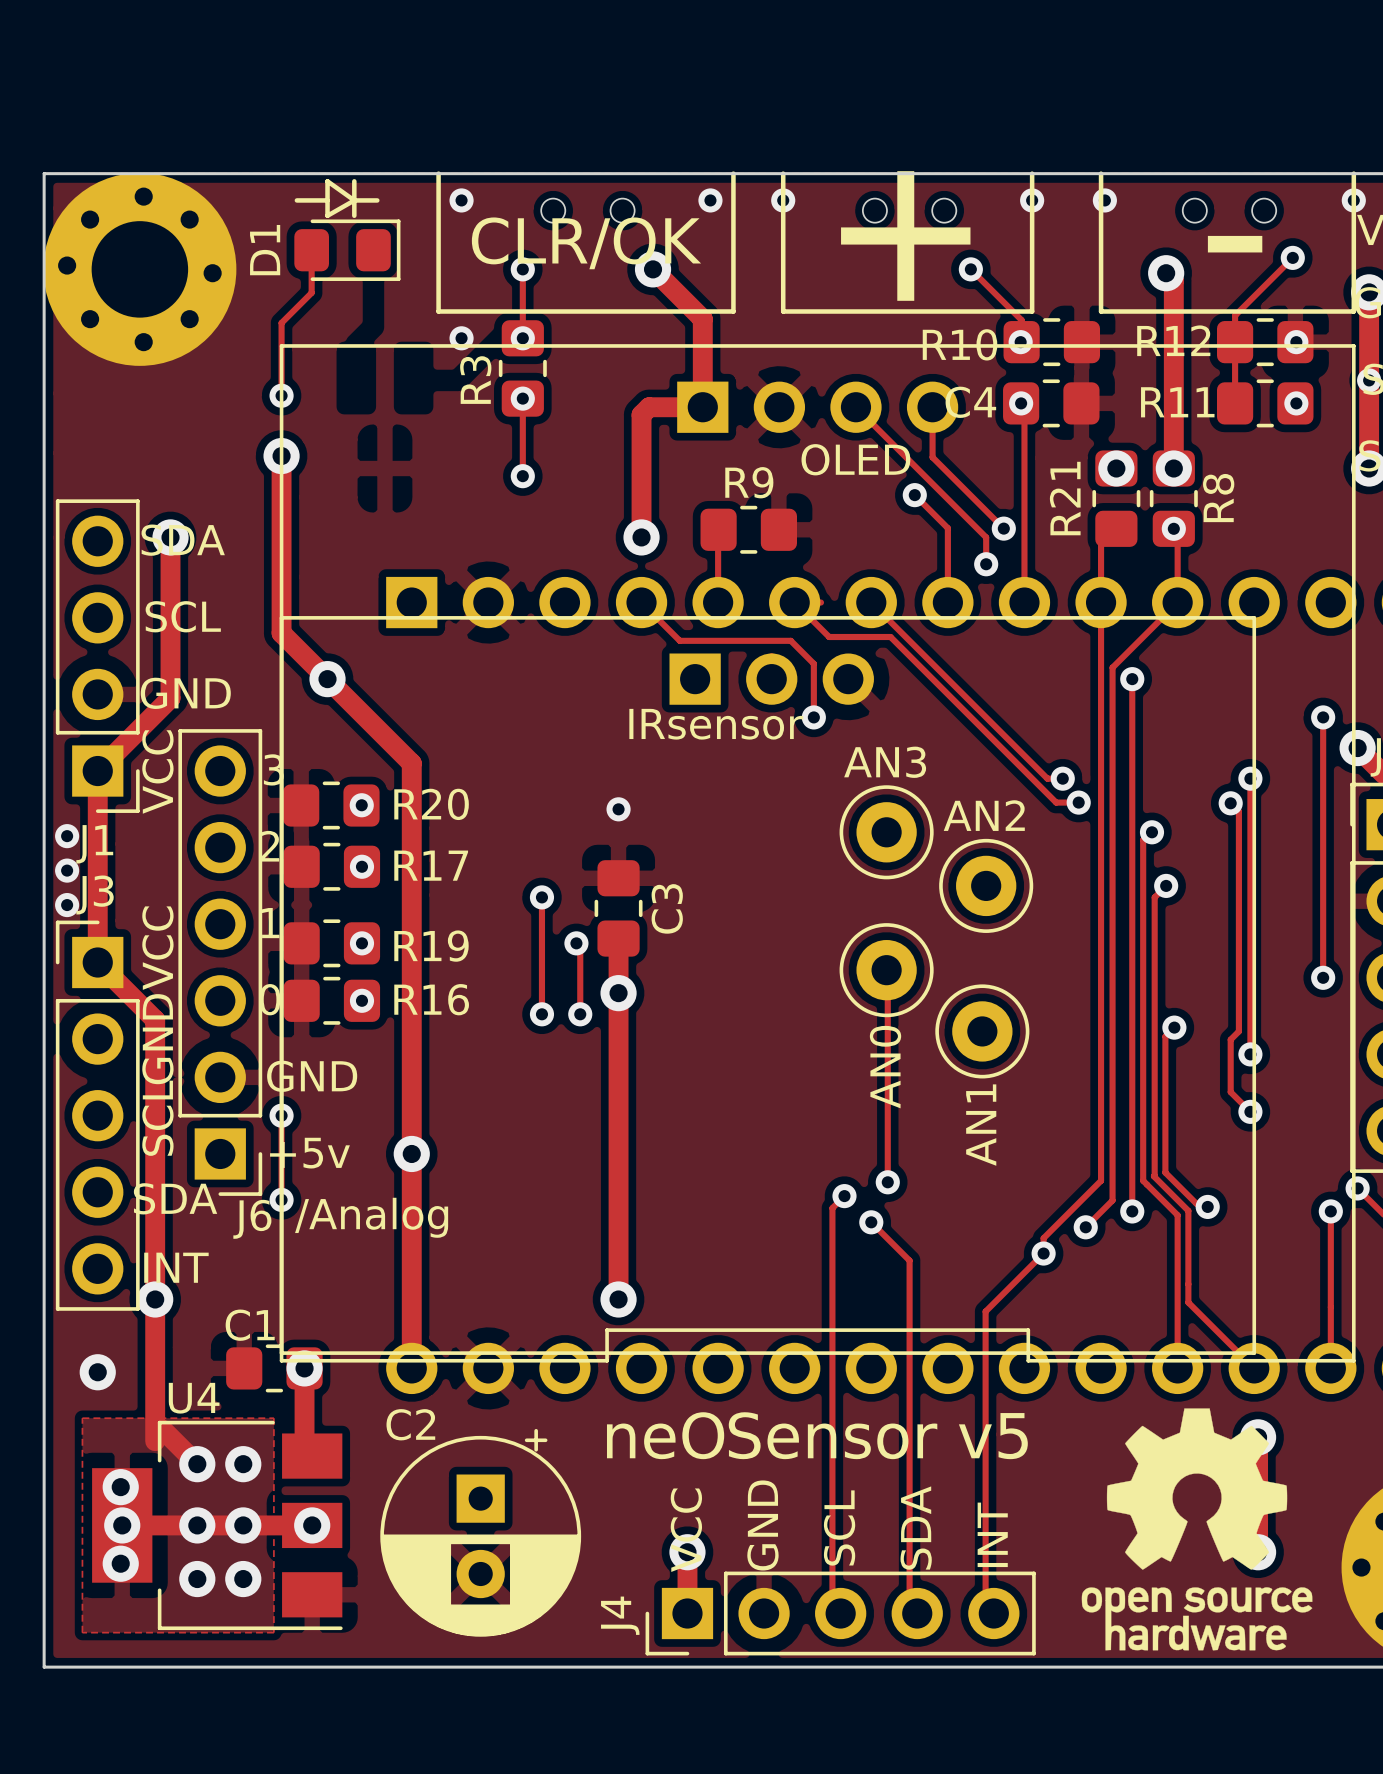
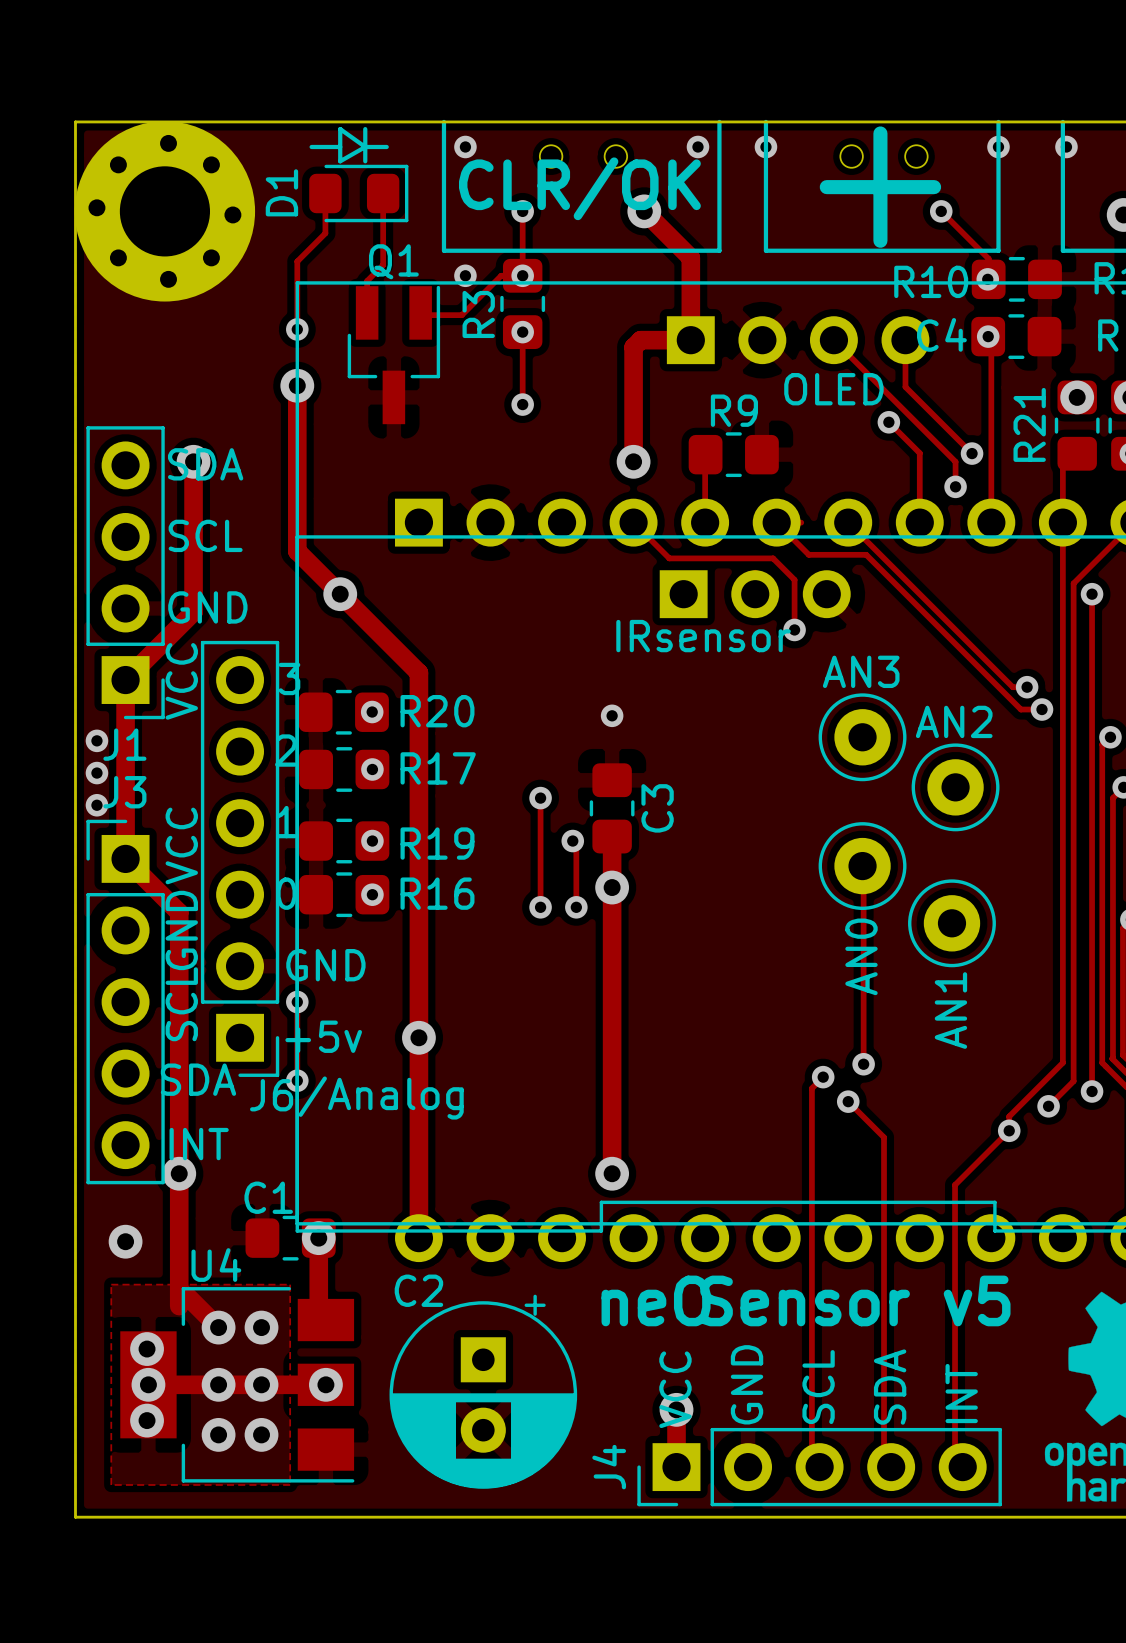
track: none -> (383, 193) (383, 265) (367, 281) (367, 312)
track: none -> (522, 275) (501, 275) (461, 315) (422, 315) (420, 312)
Q1: none -> (393, 355)

